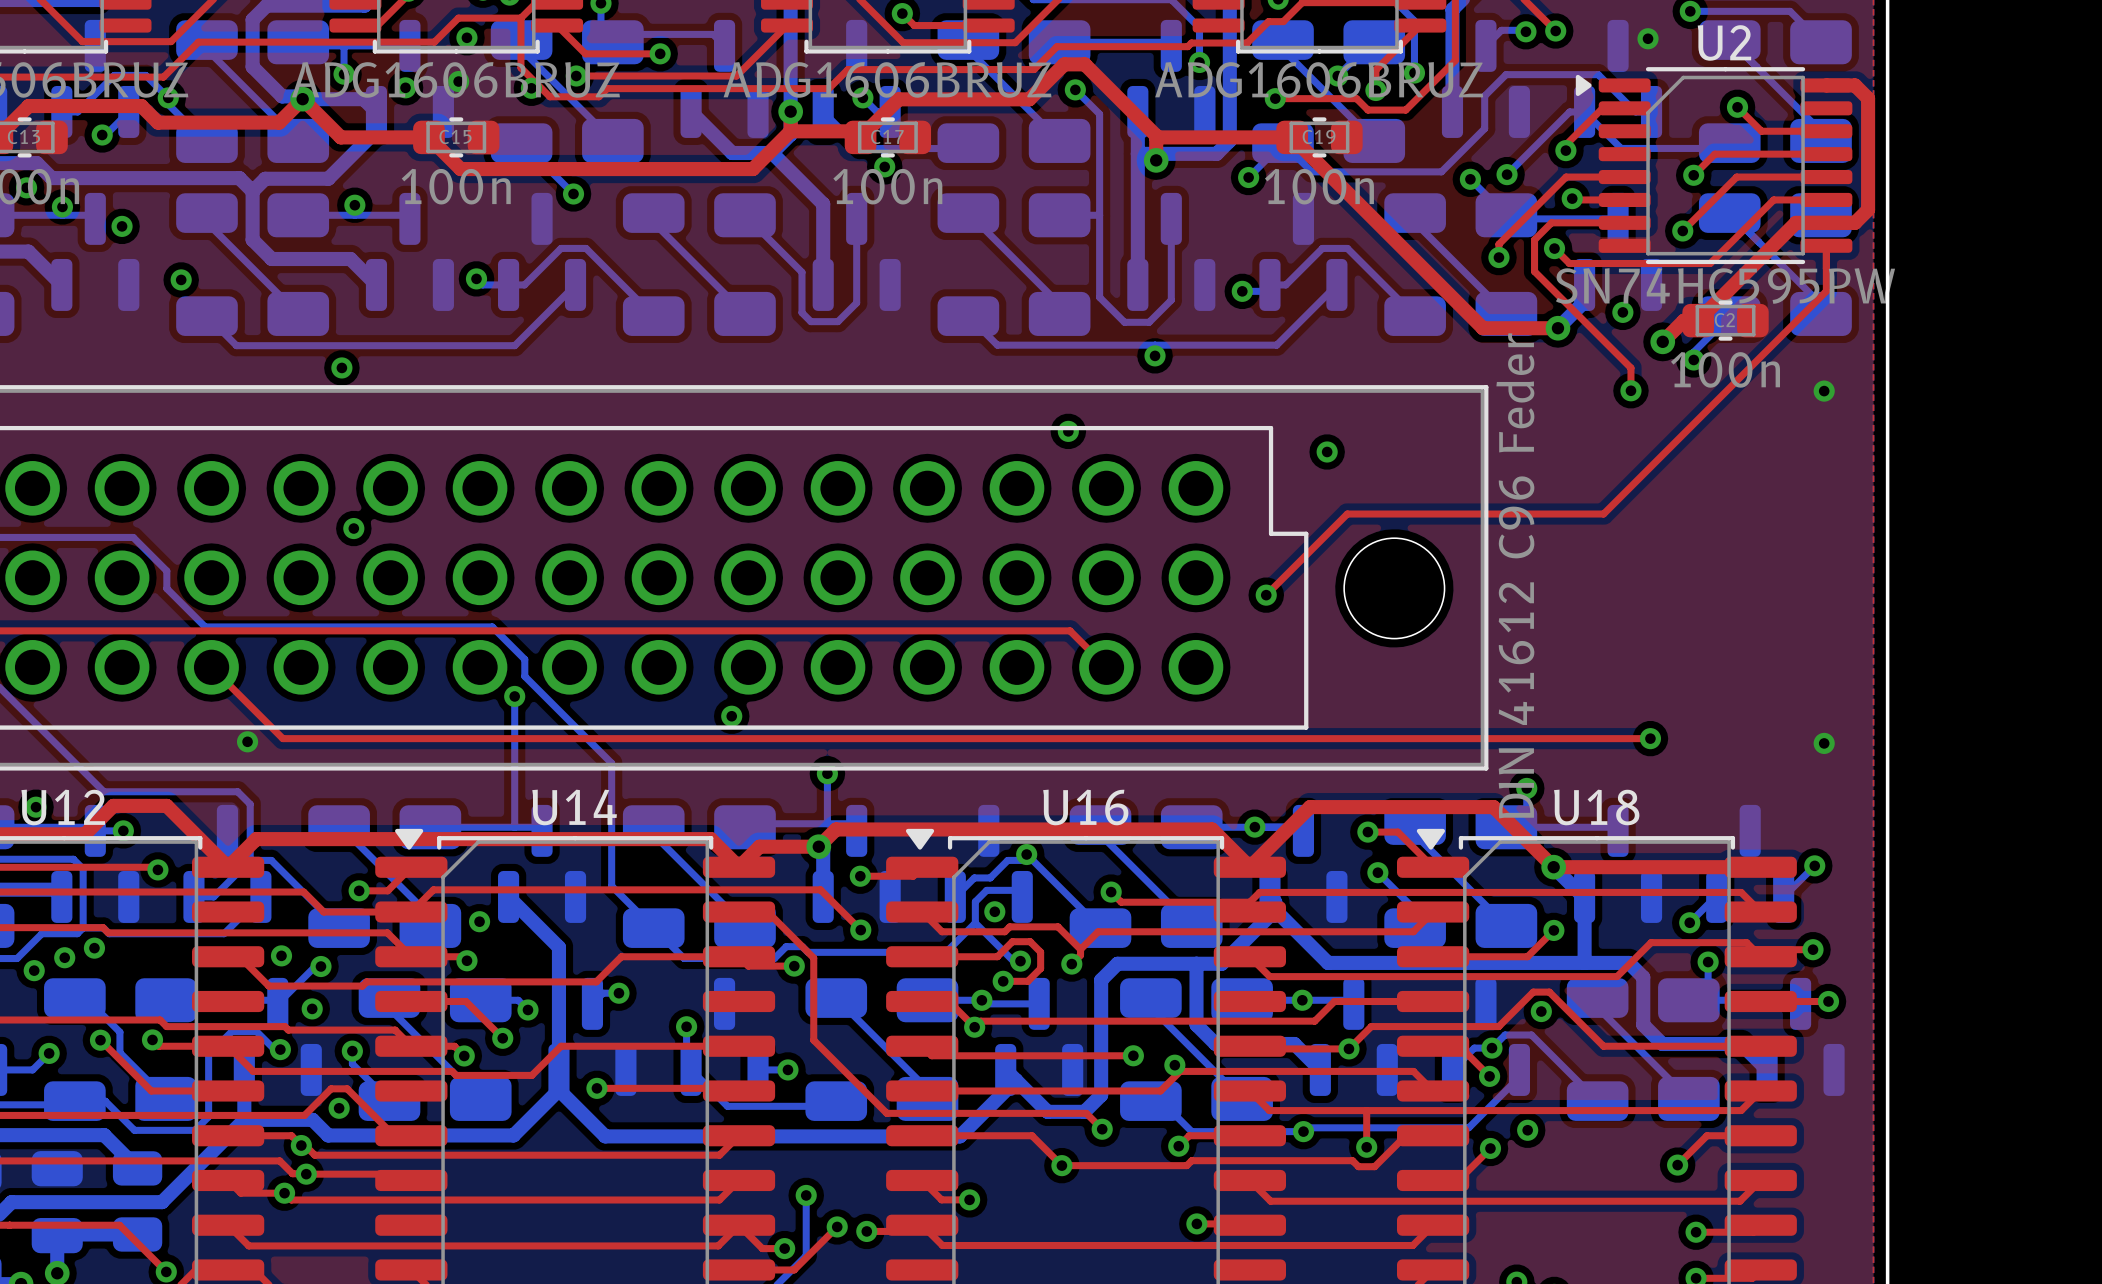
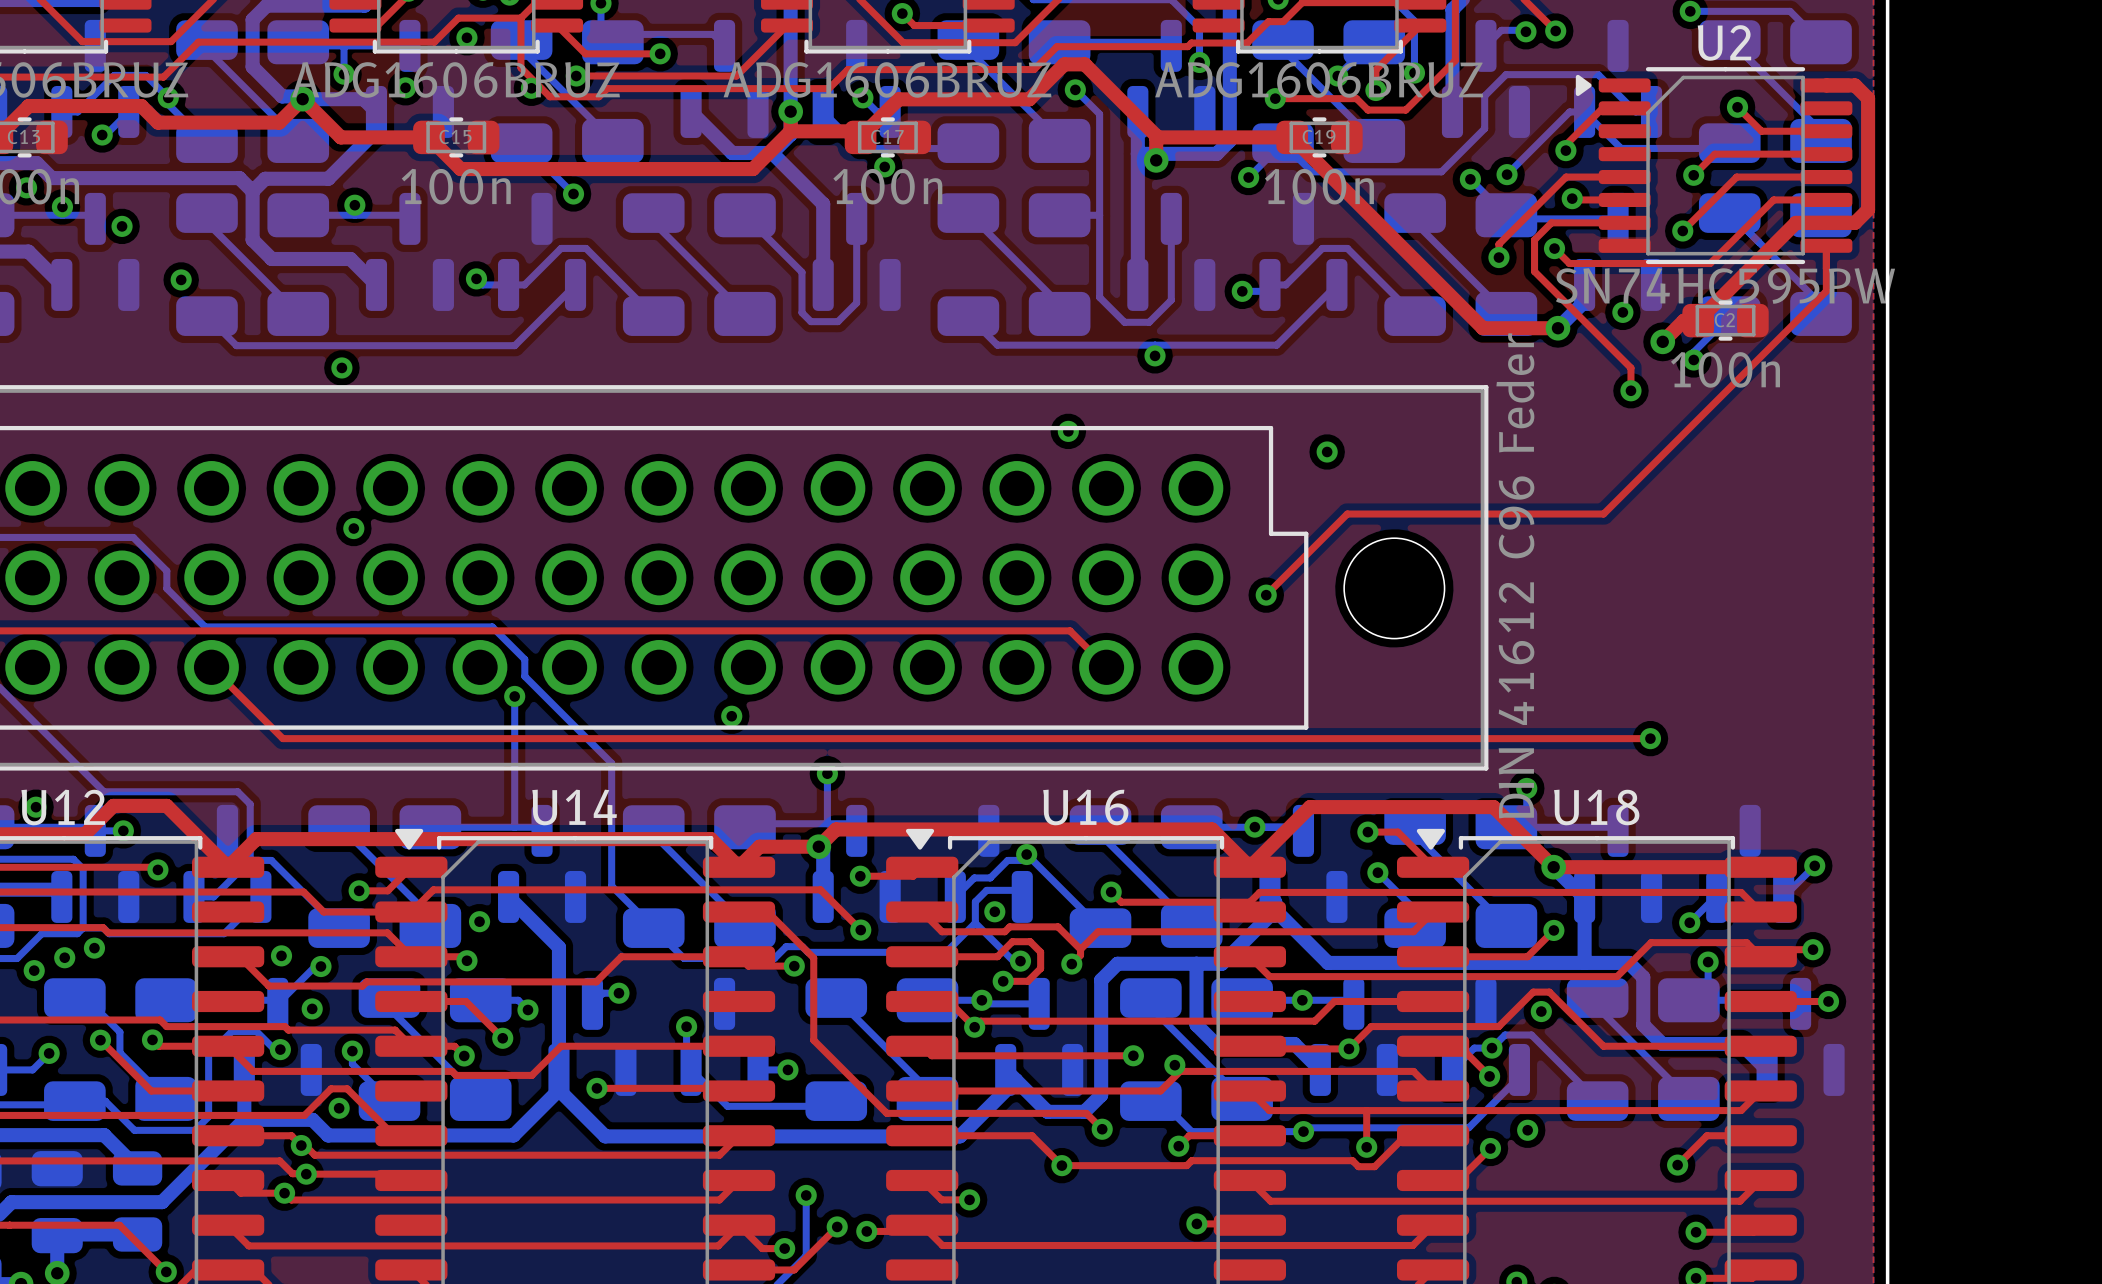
via: (1648, 38) -> none
via: (458, 81) -> none
via: (1824, 391) -> none
via: (247, 741) -> none
via: (1824, 743) -> none

